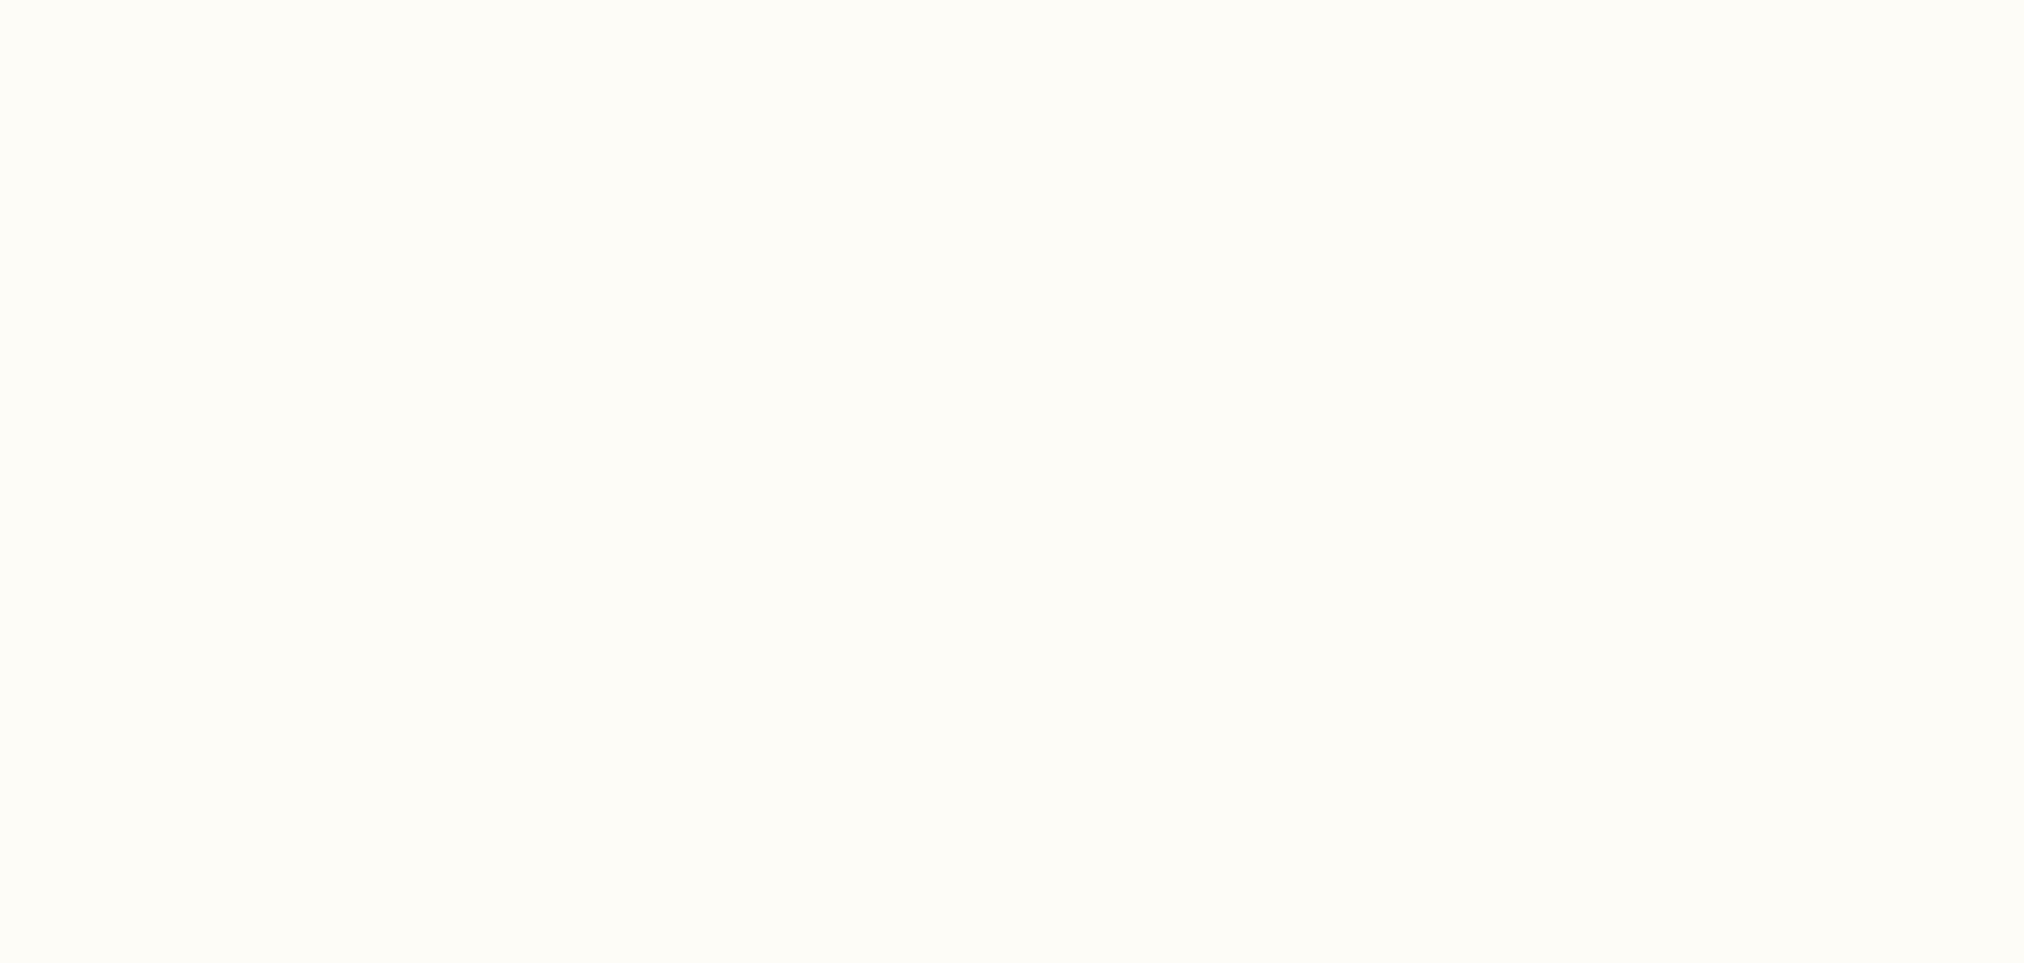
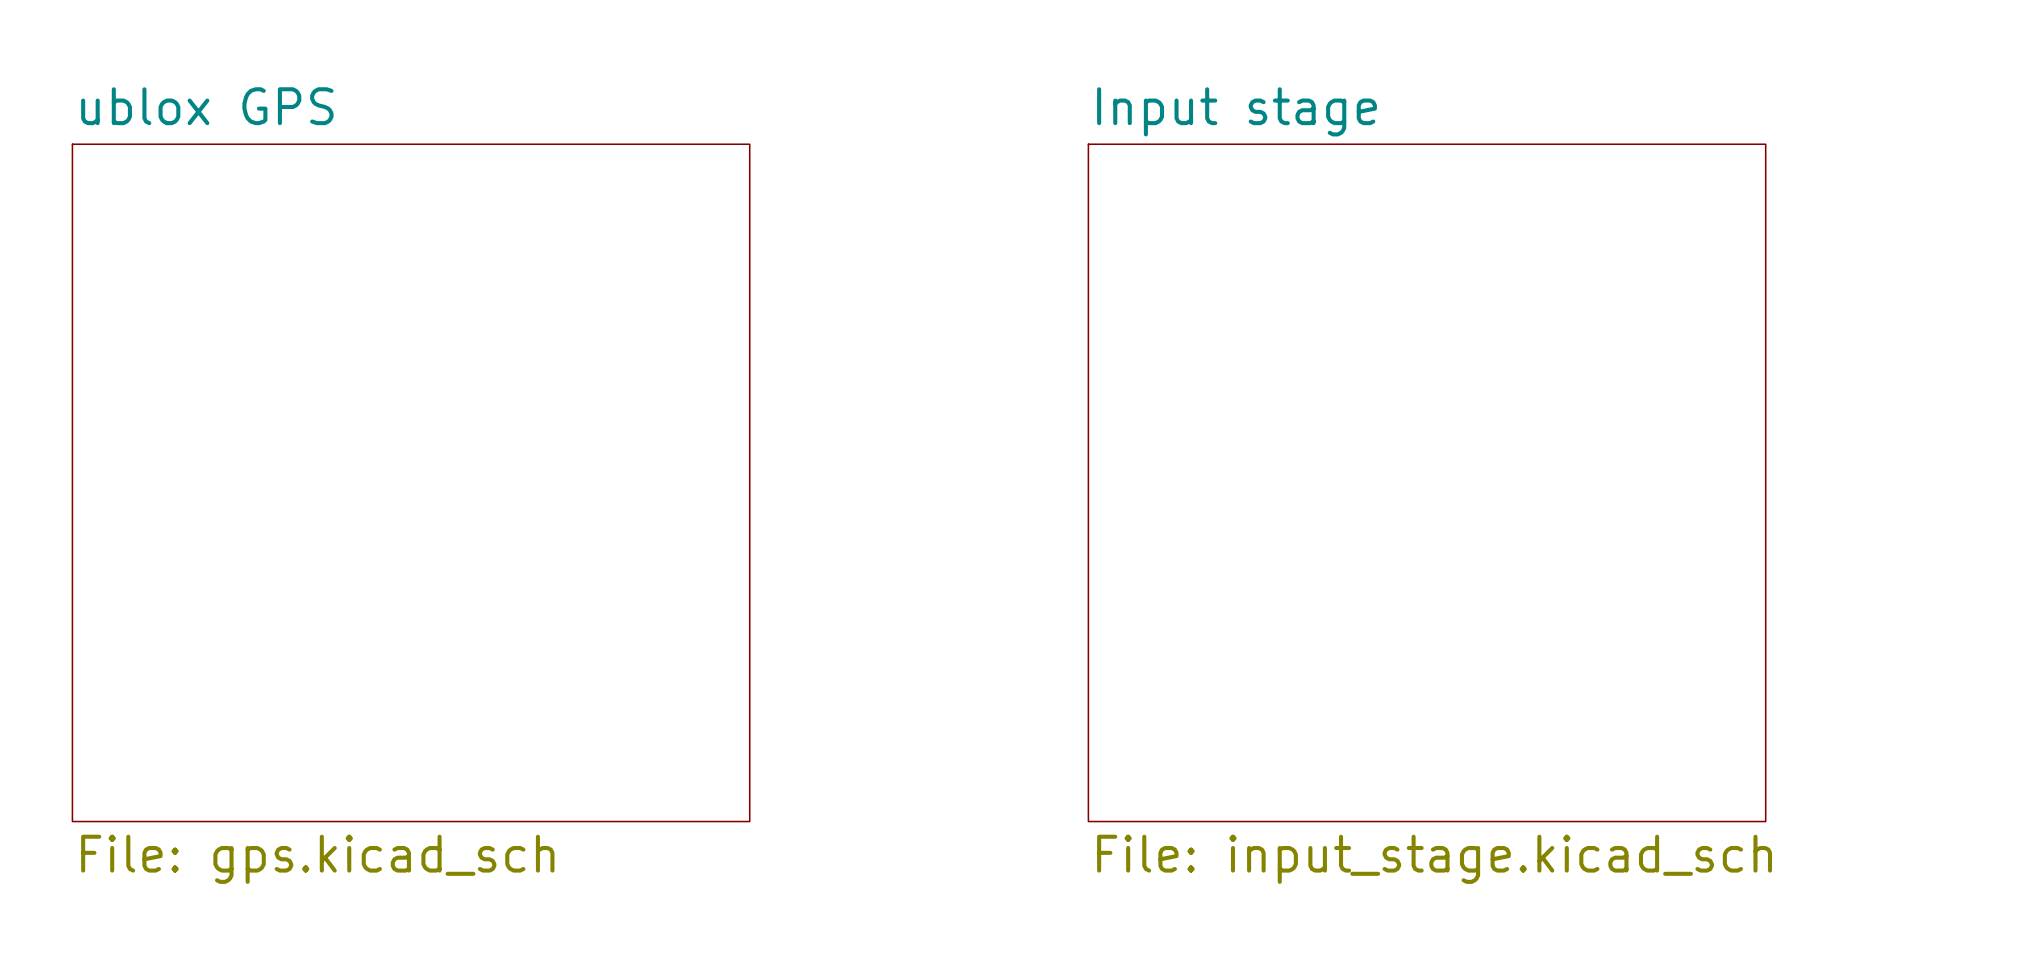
sheet ublox GPS: none -> File: gps.kicad_sch (411, 482)
sheet Input stage: none -> File: input_stage.kicad_sch (1427, 482)

